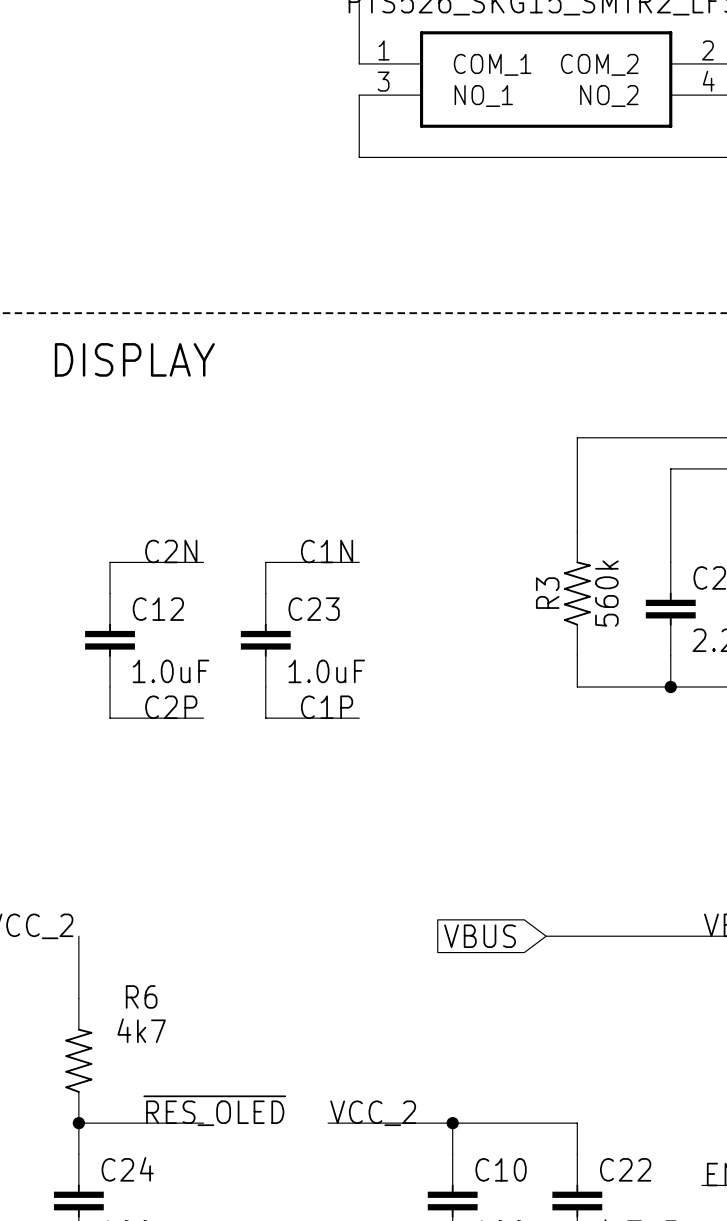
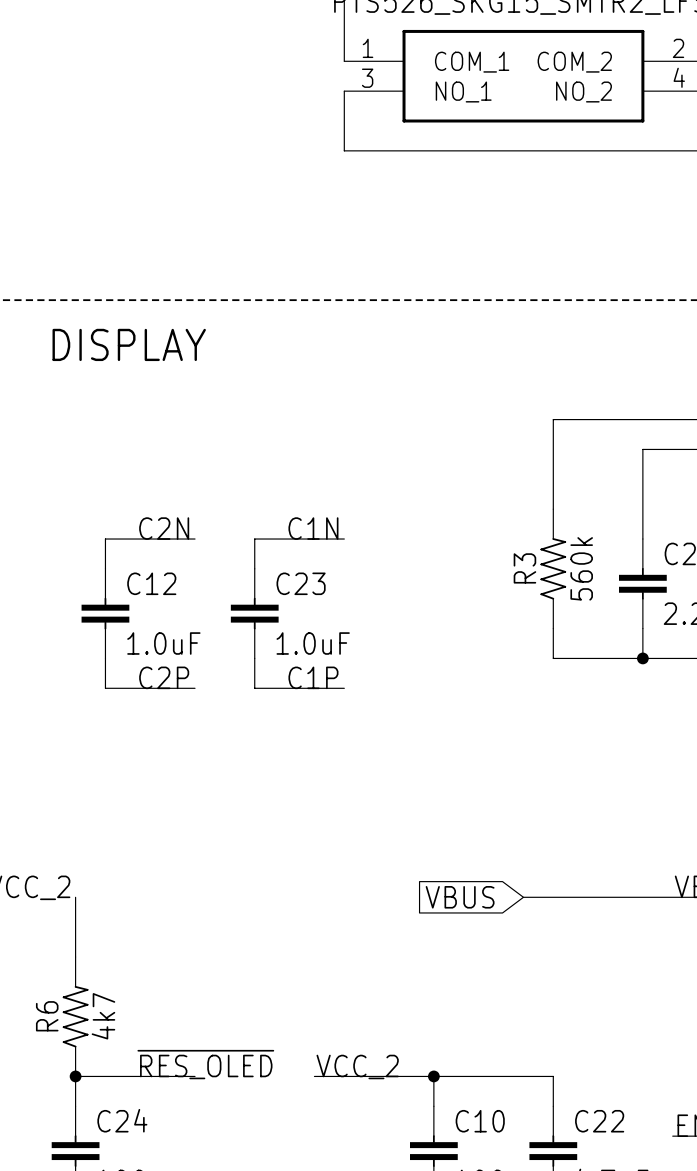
R6 name rotation: 0° (141, 996) -> 90° counterclockwise (47, 1016)
R6 name position: R6 (141, 996) -> R6 (47, 1016)
R6 value rotation: 0° (141, 1030) -> 90° counterclockwise (103, 1016)

